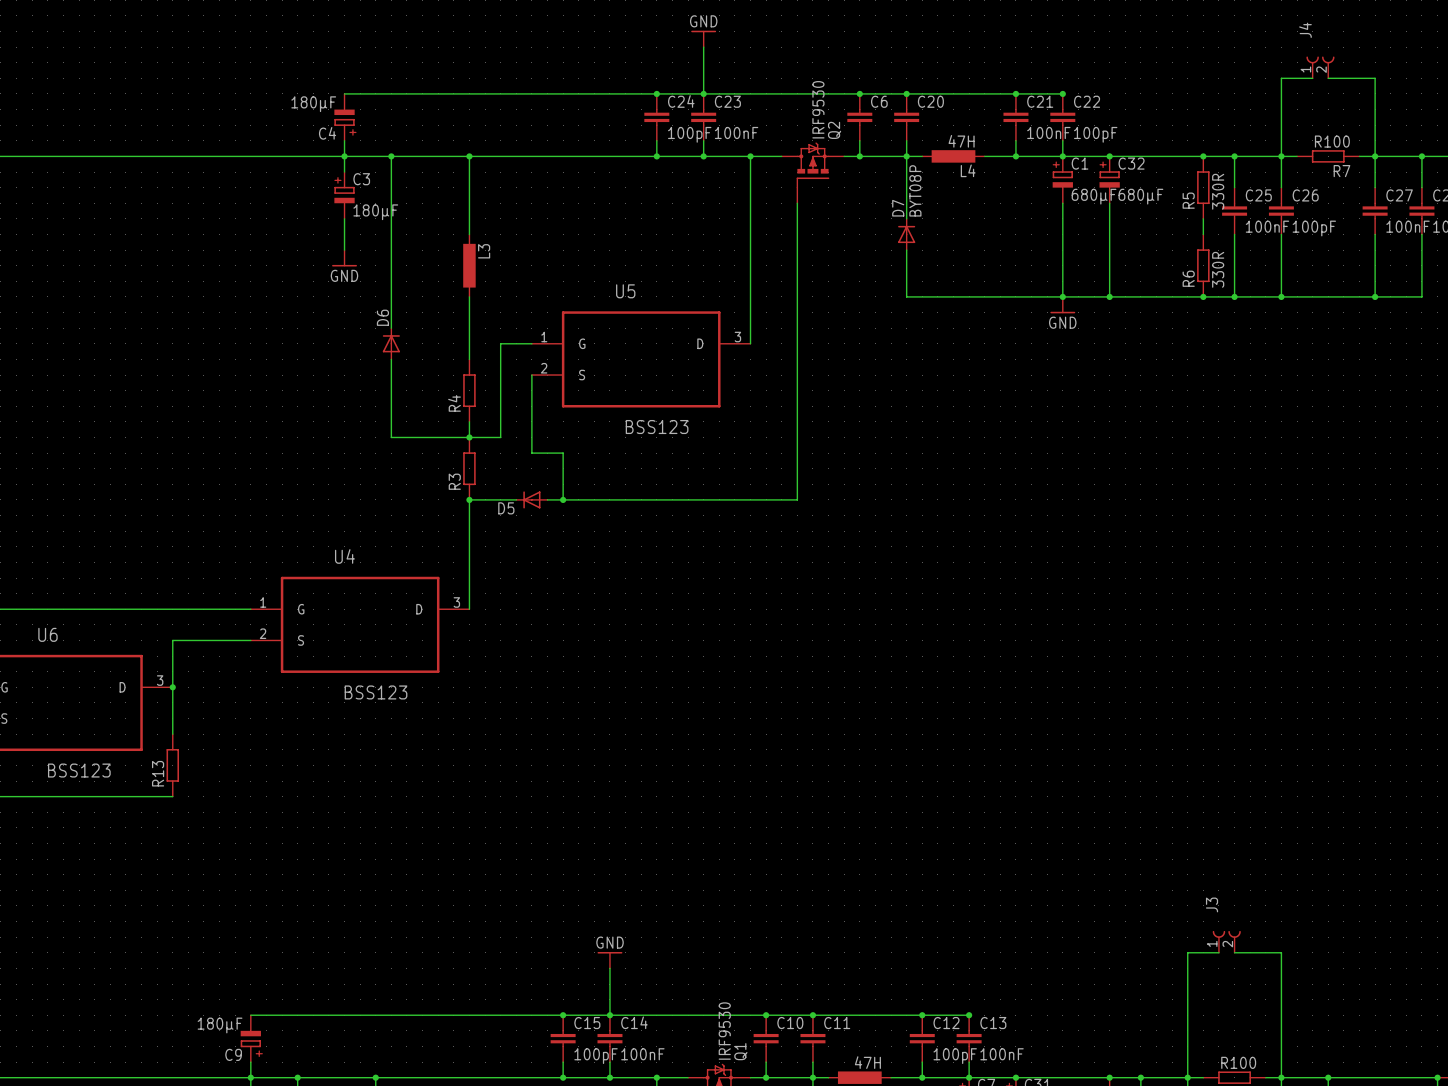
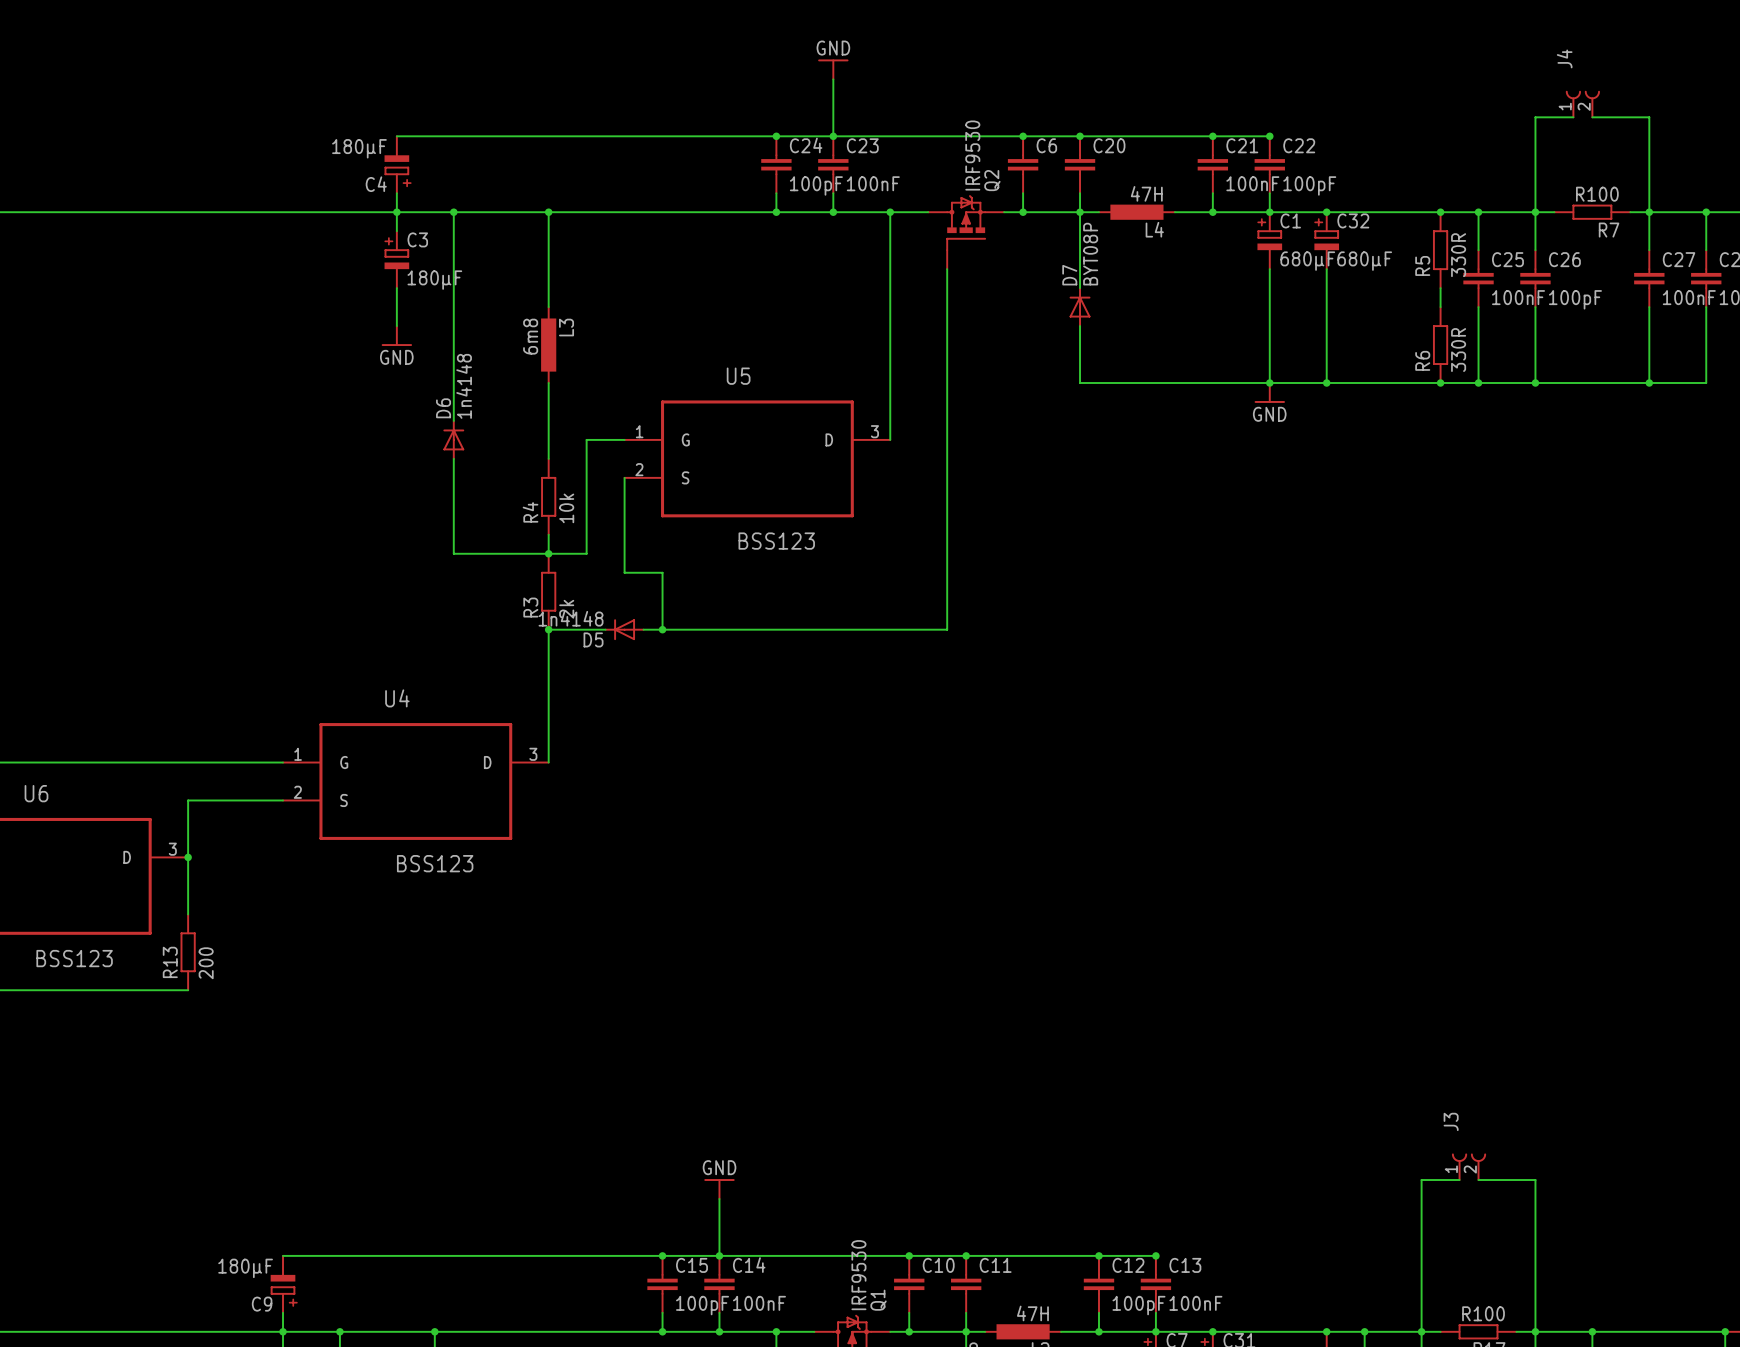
L3 value: none -> 6m8 (530, 336)
D6 value: none -> 1n4148 (464, 386)
R4 value: none -> 10k (566, 508)
R3 value: none -> 2k (566, 609)
D5 value: none -> 1n4148 (571, 618)
R13 value: none -> 200 (206, 963)

